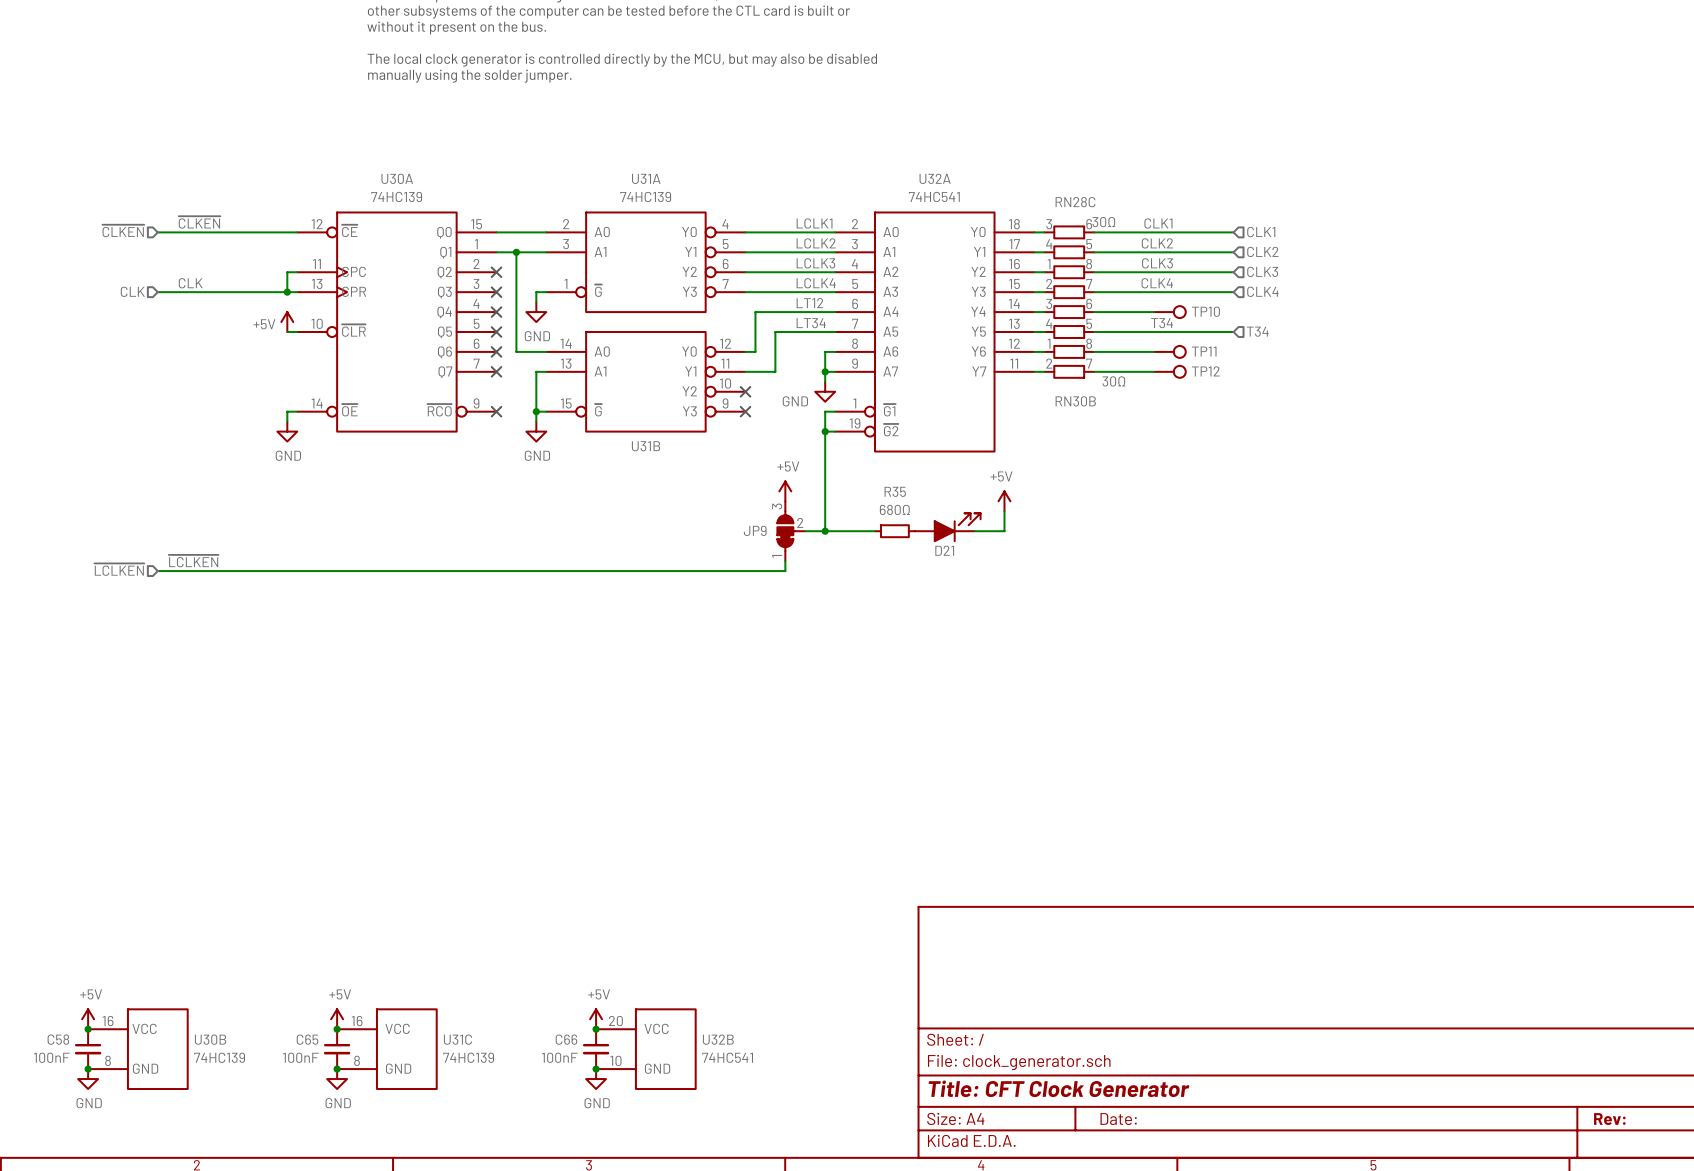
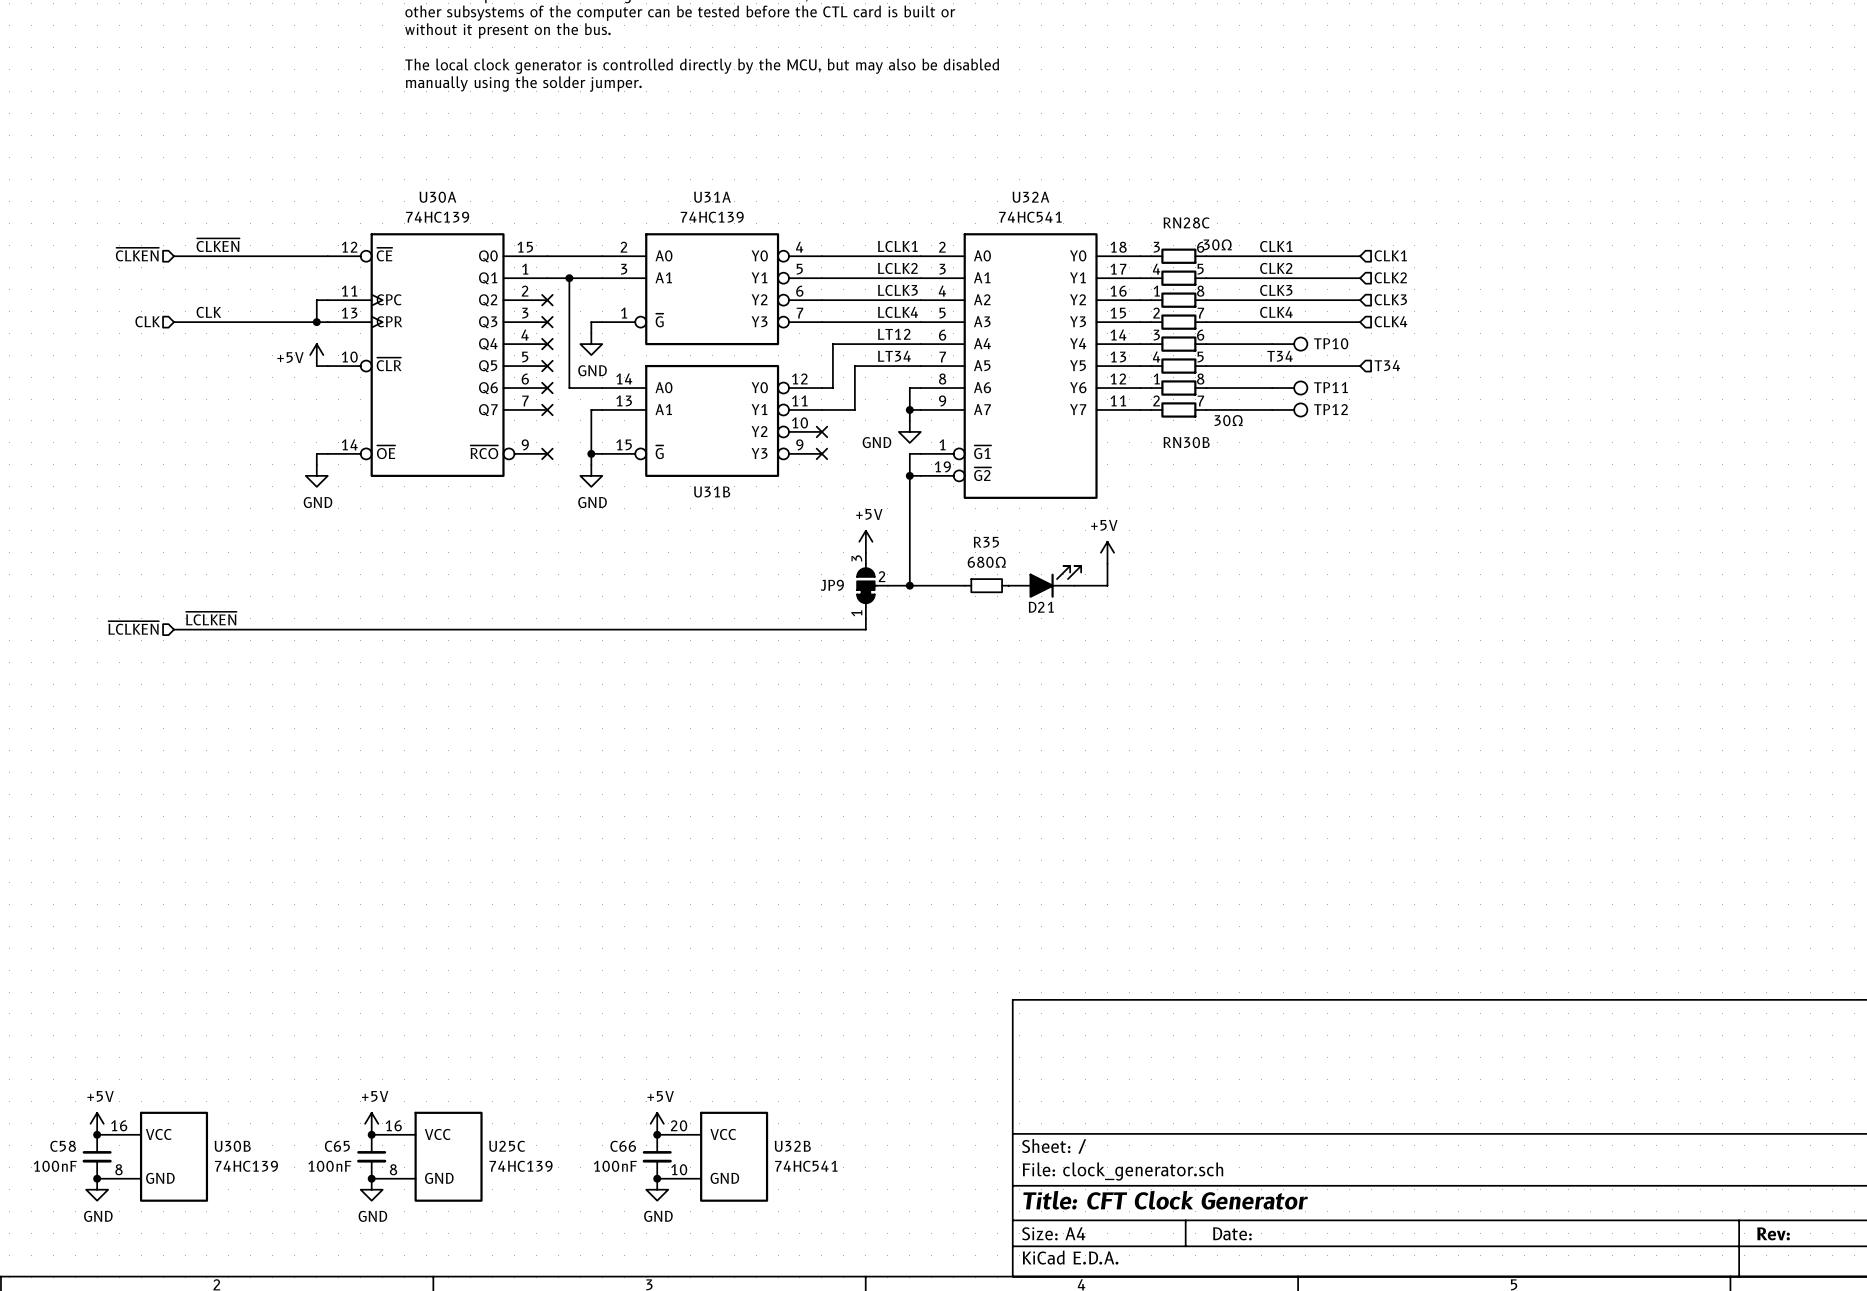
U31C name: U31C (457, 1039) -> U25C (507, 1146)

